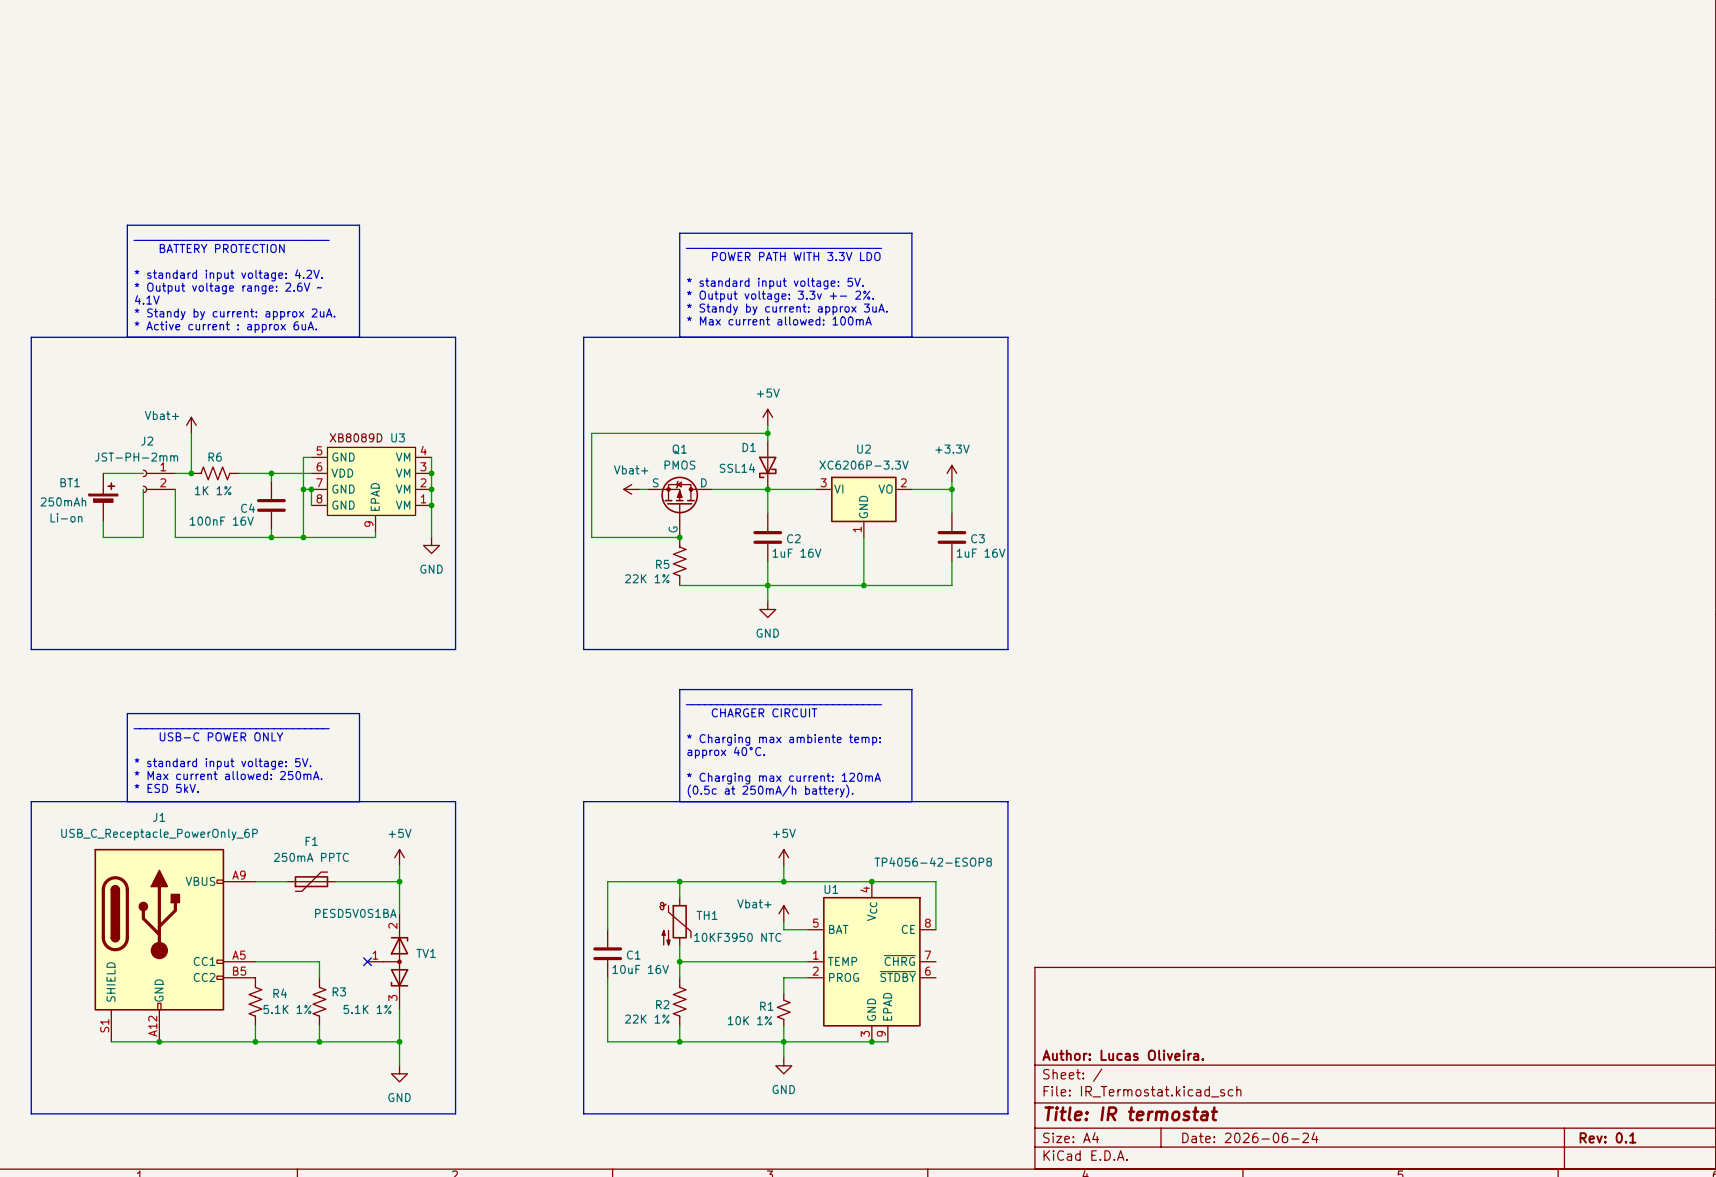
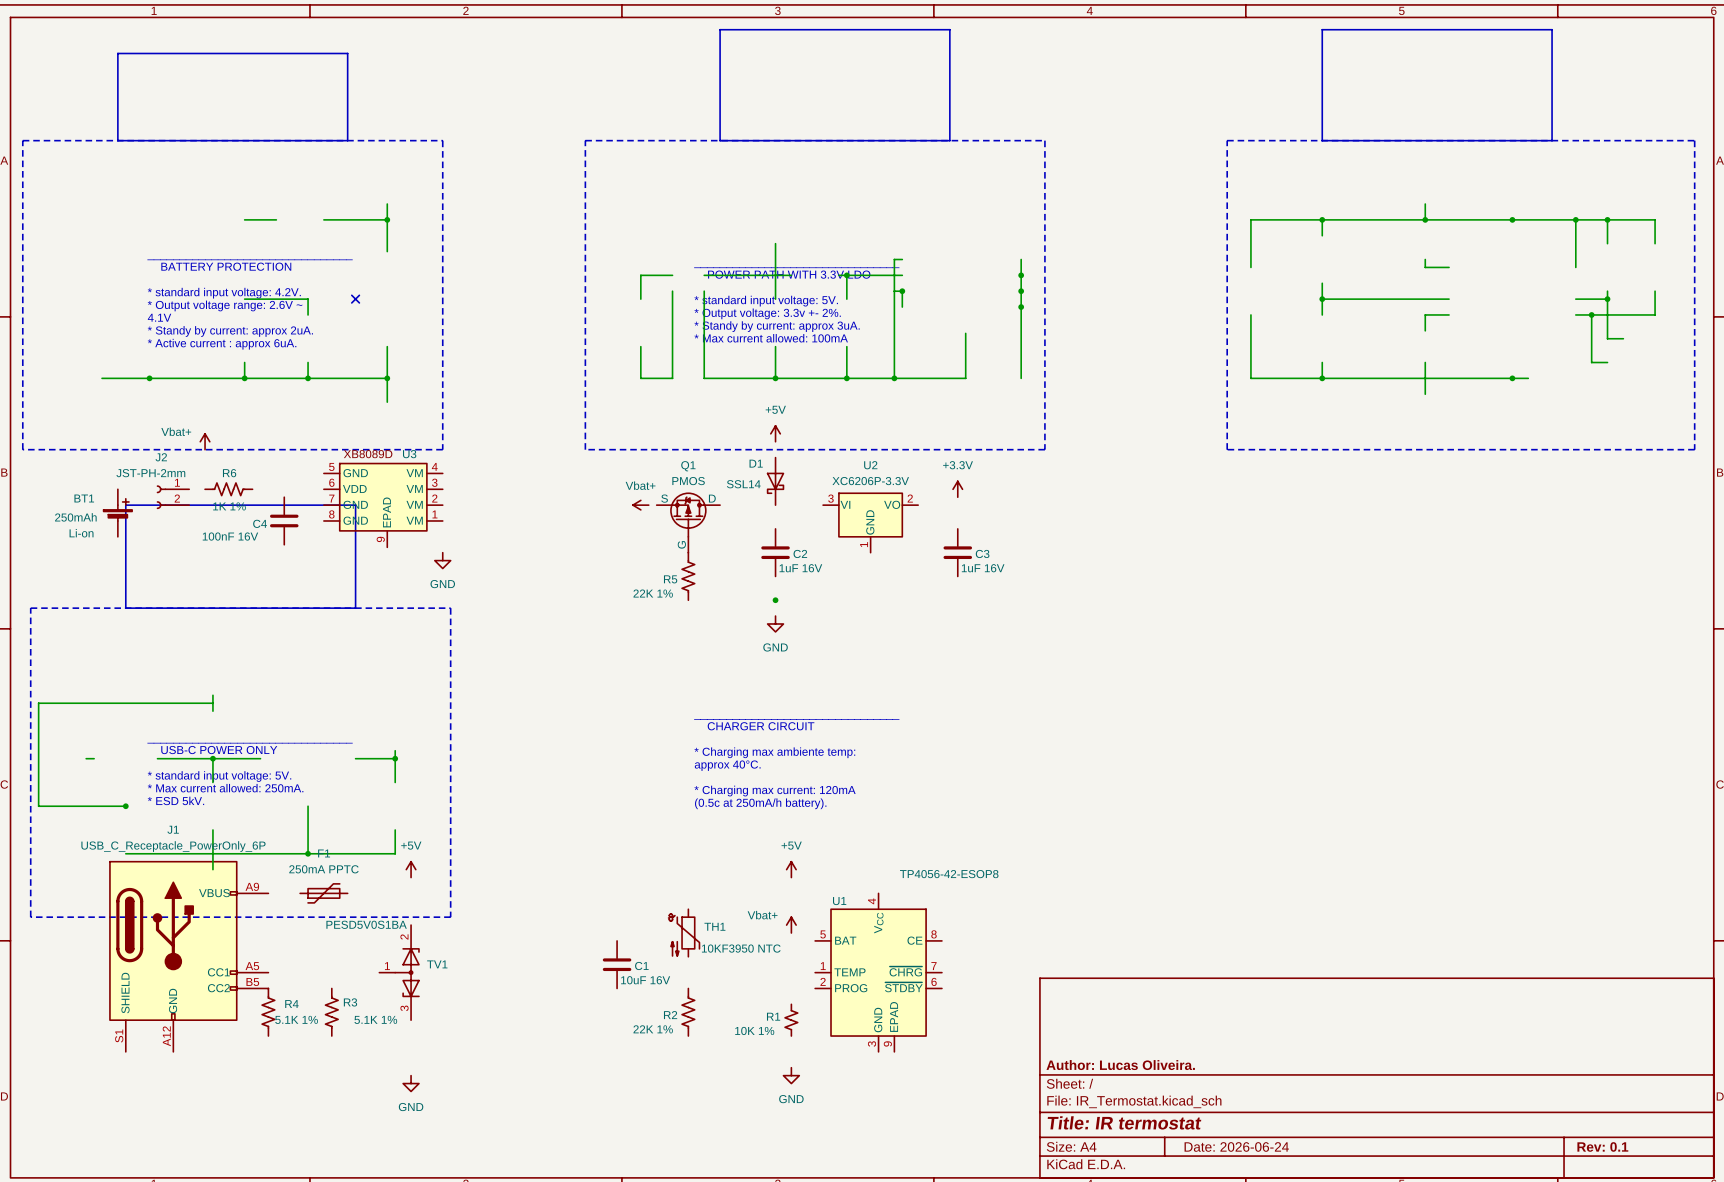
line: none -> (720, 29) (949, 29) (949, 140) (720, 140) (720, 29)
line: none -> (1322, 29) (1552, 29) (1552, 140) (1322, 140) (1322, 29)
line: none -> (117, 53) (347, 53) (347, 140) (117, 140) (117, 53)
line: none -> (22, 140) (442, 140) (442, 449) (22, 449) (22, 140)
line: none -> (585, 140) (1044, 140) (1044, 449) (585, 449) (585, 140)
line: none -> (1227, 140) (1694, 140) (1694, 449) (1227, 449) (1227, 140)
wire: none -> (387, 204) (387, 251)
wire: none -> (1425, 204) (1425, 219)
wire: none -> (244, 219) (276, 219)
wire: none -> (323, 219) (387, 219)
junction: none -> (387, 219)
wire: none -> (1322, 219) (1322, 235)
junction: none -> (1322, 219)
junction: none -> (1425, 219)
junction: none -> (1512, 219)
wire: none -> (1575, 219) (1575, 267)
junction: none -> (1575, 219)
wire: none -> (1607, 219) (1607, 243)
junction: none -> (1607, 219)
wire: none -> (775, 243) (775, 299)
wire: none -> (1655, 243) (1655, 219) (1250, 219) (1250, 267)
wire: none -> (902, 259) (894, 259) (894, 378)
wire: none -> (1021, 259) (1021, 378)
wire: none -> (1425, 259) (1425, 267) (1449, 267)
wire: none -> (672, 275) (640, 275) (640, 299)
wire: none -> (704, 275) (791, 275)
wire: none -> (838, 275) (902, 275)
wire: none -> (846, 275) (846, 299)
junction: none -> (846, 275)
junction: none -> (1021, 275)
wire: none -> (1322, 283) (1322, 314)
wire: none -> (672, 291) (672, 378) (640, 378) (640, 346)
wire: none -> (704, 291) (704, 378) (965, 378) (965, 333)
wire: none -> (894, 291) (902, 291) (902, 307)
junction: none -> (902, 291)
junction: none -> (1021, 291)
wire: none -> (1607, 291) (1607, 338) (1623, 338)
wire: none -> (1655, 291) (1655, 314) (1575, 314)
wire: none -> (244, 299) (308, 299) (308, 314)
no-connect mark: none -> (355, 299)
wire: none -> (1322, 299) (1449, 299)
junction: none -> (1322, 299)
wire: none -> (1575, 299) (1607, 299)
junction: none -> (1607, 299)
junction: none -> (1021, 307)
wire: none -> (1250, 314) (1250, 378) (1528, 378)
wire: none -> (1449, 314) (1425, 314) (1425, 330)
wire: none -> (1591, 314) (1591, 362) (1607, 362)
junction: none -> (1591, 314)
wire: none -> (387, 346) (387, 402)
wire: none -> (775, 346) (775, 378)
wire: none -> (846, 346) (846, 378)
line: (31, 337) (455, 337) (455, 649) (31, 649) (31, 337) -> none
line: (127, 337) (127, 225) (359, 225) (359, 337) -> none
line: (583, 337) (1007, 337) (1007, 649) (583, 649) (583, 337) -> none
line: (679, 337) (679, 233) (911, 233) (911, 337) -> none
wire: none -> (244, 362) (244, 378)
wire: none -> (308, 362) (308, 378)
wire: none -> (1322, 362) (1322, 378)
wire: none -> (1425, 362) (1425, 394)
wire: none -> (102, 378) (387, 378)
junction: none -> (149, 378)
junction: none -> (244, 378)
junction: none -> (308, 378)
junction: none -> (387, 378)
junction: none -> (775, 378)
junction: none -> (846, 378)
junction: none -> (894, 378)
junction: none -> (1322, 378)
junction: none -> (1512, 378)
wire: (767, 425) (767, 441) -> none
wire: (191, 433) (191, 473) (175, 473) -> none
wire: (767, 433) (591, 433) (591, 537) (679, 537) -> none
junction: (767, 433) -> none
wire: (311, 457) (303, 457) (303, 537) -> none
wire: (431, 457) (431, 537) -> none
wire: (103, 473) (143, 473) -> none
junction: (191, 473) -> none
wire: (239, 473) (311, 473) -> none
wire: (271, 473) (271, 481) -> none
junction: (271, 473) -> none
junction: (431, 473) -> none
wire: (951, 481) (951, 513) -> none
line: none -> (125, 505) (355, 505) (355, 608) (125, 608) (125, 505)
wire: (143, 489) (143, 537) (103, 537) (103, 521) -> none
wire: (175, 489) (175, 537) (375, 537) (375, 532) -> none
wire: (303, 489) (311, 489) (311, 505) -> none
junction: (303, 489) -> none
junction: (311, 489) -> none
junction: (431, 489) -> none
wire: (639, 489) (647, 489) -> none
wire: (711, 489) (815, 489) -> none
wire: (767, 489) (767, 513) -> none
junction: (767, 489) -> none
wire: (911, 489) (951, 489) -> none
junction: (951, 489) -> none
junction: (431, 505) -> none
wire: (271, 529) (271, 537) -> none
junction: (271, 537) -> none
junction: (303, 537) -> none
junction: (679, 537) -> none
wire: (863, 537) (863, 585) -> none
wire: (767, 561) (767, 601) -> none
wire: (951, 561) (951, 585) (679, 585) -> none
junction: (863, 585) -> none
line: none -> (30, 608) (450, 608) (450, 917) (30, 917) (30, 608)
wire: none -> (212, 695) (212, 711)
wire: none -> (212, 703) (38, 703) (38, 806) (125, 806)
wire: none -> (395, 750) (395, 782)
wire: none -> (86, 758) (94, 758)
wire: none -> (157, 758) (260, 758)
wire: none -> (212, 758) (212, 782)
junction: none -> (212, 758)
wire: none -> (355, 758) (395, 758)
junction: none -> (395, 758)
junction: none -> (125, 806)
line: (31, 801) (31, 1113) (455, 1113) (455, 801) (31, 801) -> none
line: (127, 801) (127, 713) (359, 713) (359, 801) -> none
line: (583, 801) (1007, 801) (1007, 1113) (583, 1113) (583, 801) -> none
line: (679, 801) (679, 689) (911, 689) (911, 801) -> none
wire: none -> (212, 830) (212, 869)
wire: none -> (395, 830) (395, 853) (125, 853)
junction: none -> (308, 853)
wire: (399, 865) (399, 913) -> (308, 806) (308, 853)
wire: (783, 865) (783, 881) -> none
wire: (255, 881) (287, 881) -> none
wire: (335, 881) (399, 881) -> none
junction: (399, 881) -> none
wire: (679, 881) (679, 897) -> none
junction: (679, 881) -> none
junction: (783, 881) -> none
junction: (871, 881) -> none
wire: (783, 921) (783, 929) (807, 929) -> none
wire: (607, 929) (607, 881) (935, 881) (935, 929) -> none
wire: (679, 945) (679, 977) -> none
wire: (255, 961) (319, 961) (319, 977) -> none
no-connect mark: (367, 961) -> none
wire: (679, 961) (807, 961) -> none
junction: (679, 961) -> none
wire: (607, 977) (607, 1041) (887, 1041) -> none
wire: (807, 977) (783, 977) (783, 993) -> none
wire: (399, 1009) (399, 1065) -> none
wire: (255, 1025) (255, 1041) -> none
wire: (319, 1025) (319, 1041) -> none
wire: (679, 1025) (679, 1041) -> none
wire: (783, 1025) (783, 1057) -> none
wire: (111, 1041) (399, 1041) -> none
junction: (159, 1041) -> none
junction: (255, 1041) -> none
junction: (319, 1041) -> none
junction: (399, 1041) -> none
junction: (679, 1041) -> none
junction: (783, 1041) -> none
junction: (871, 1041) -> none

